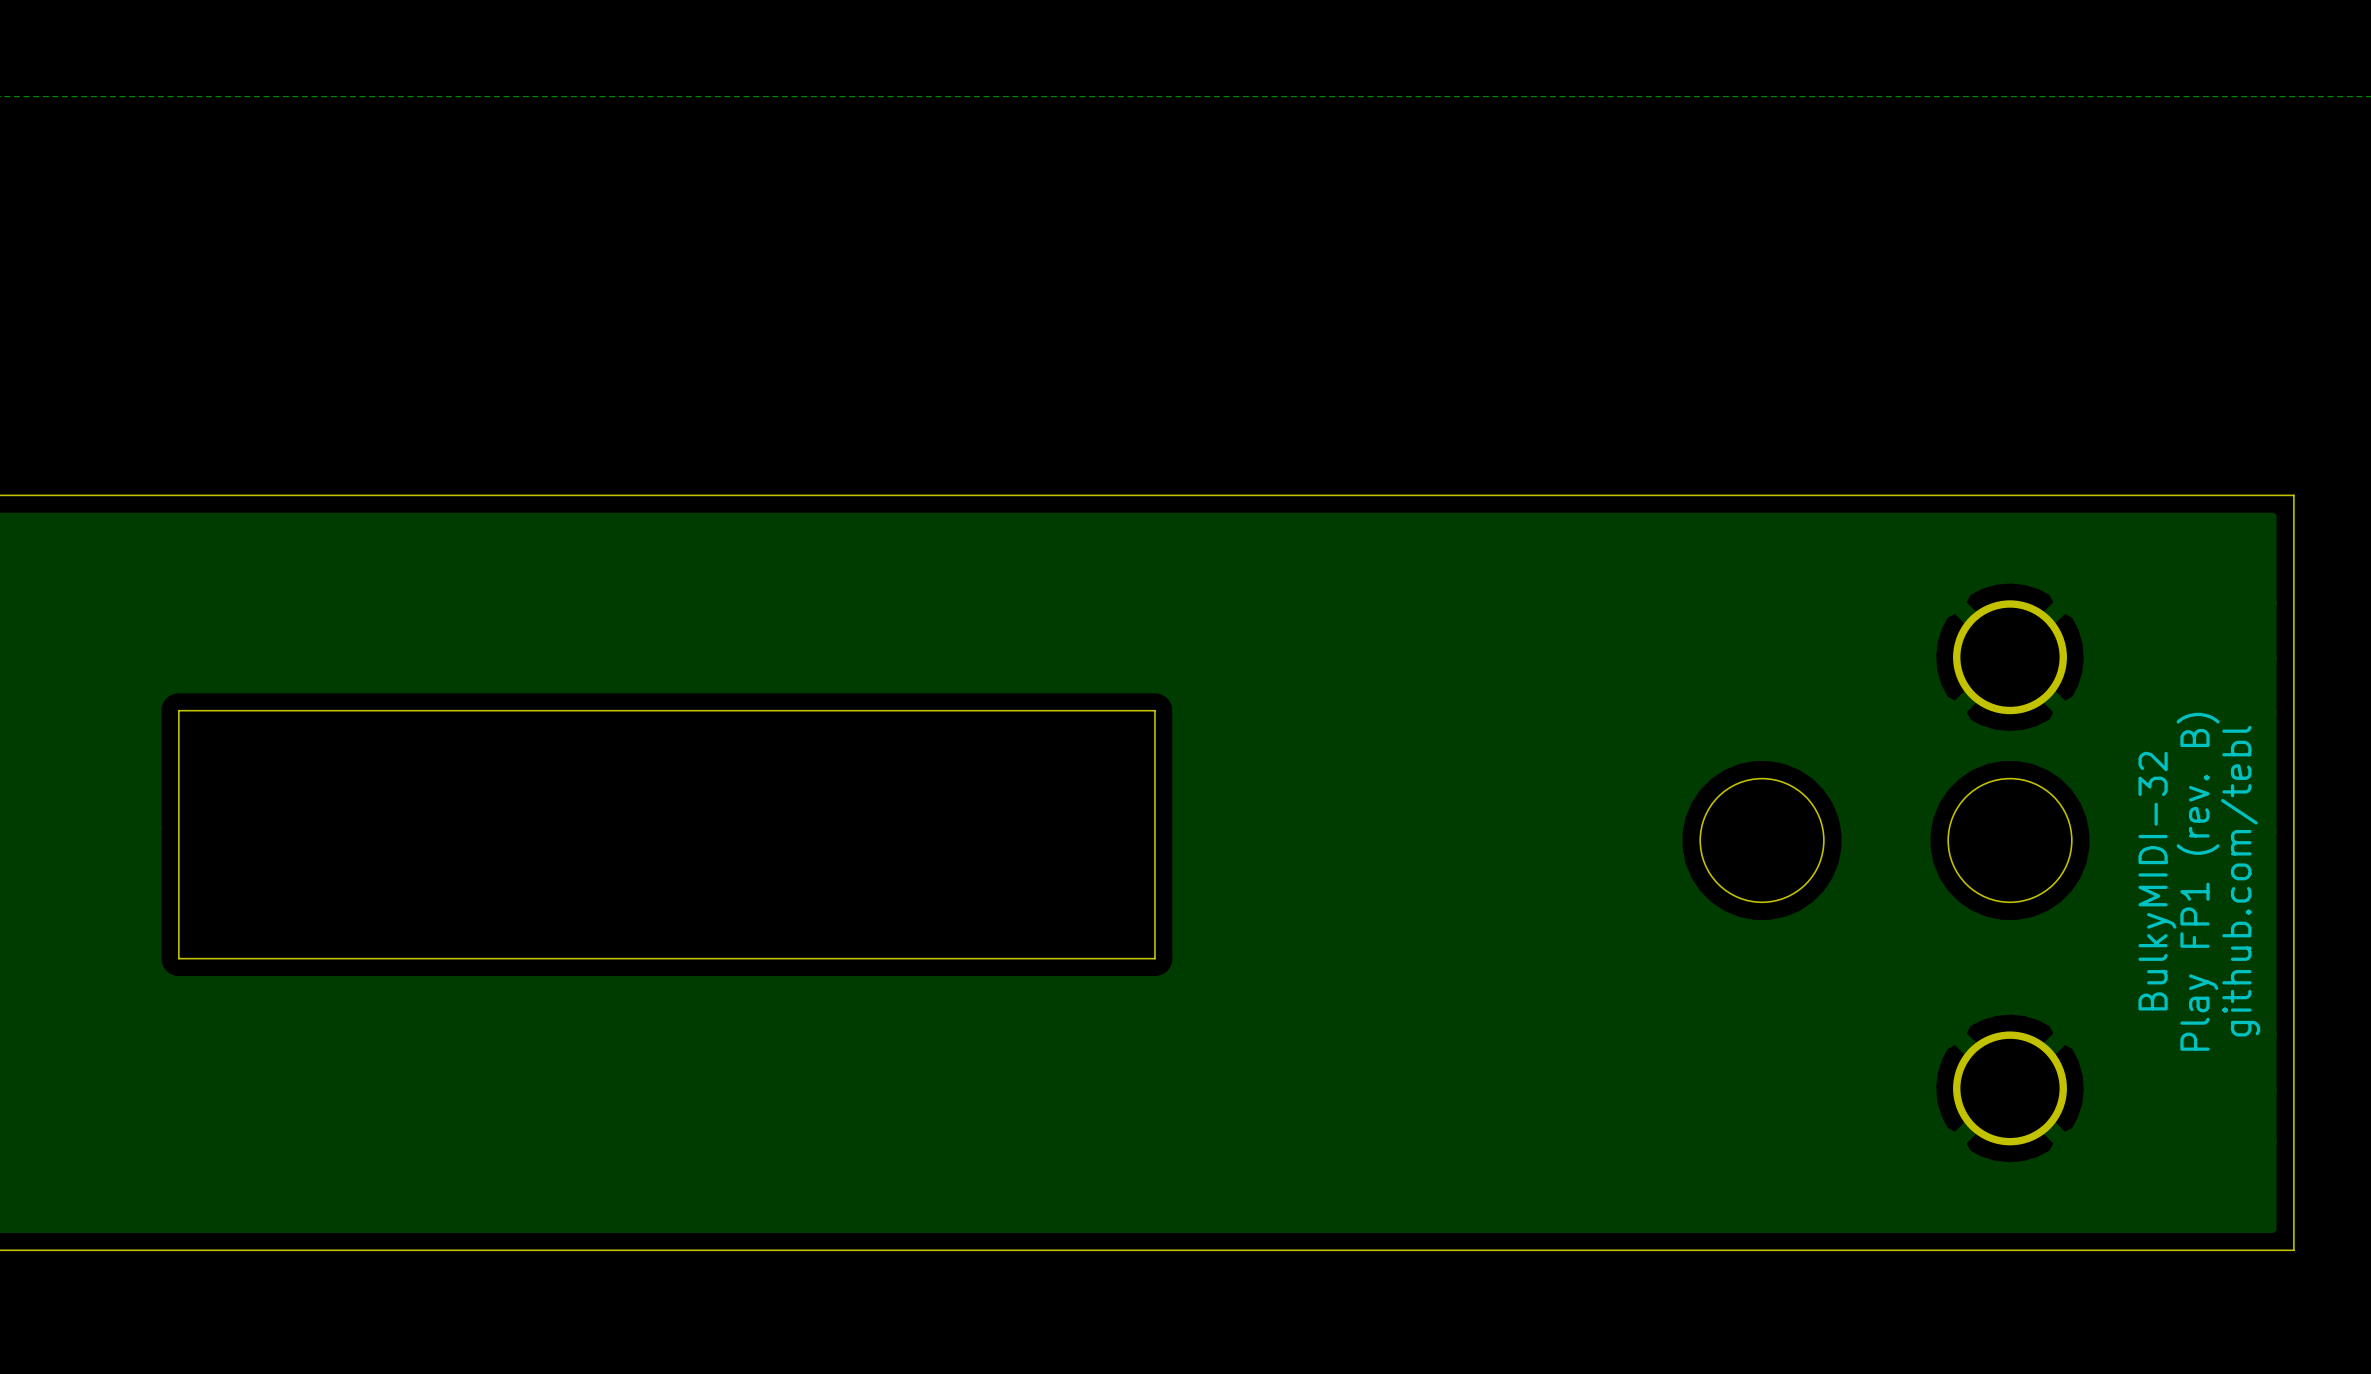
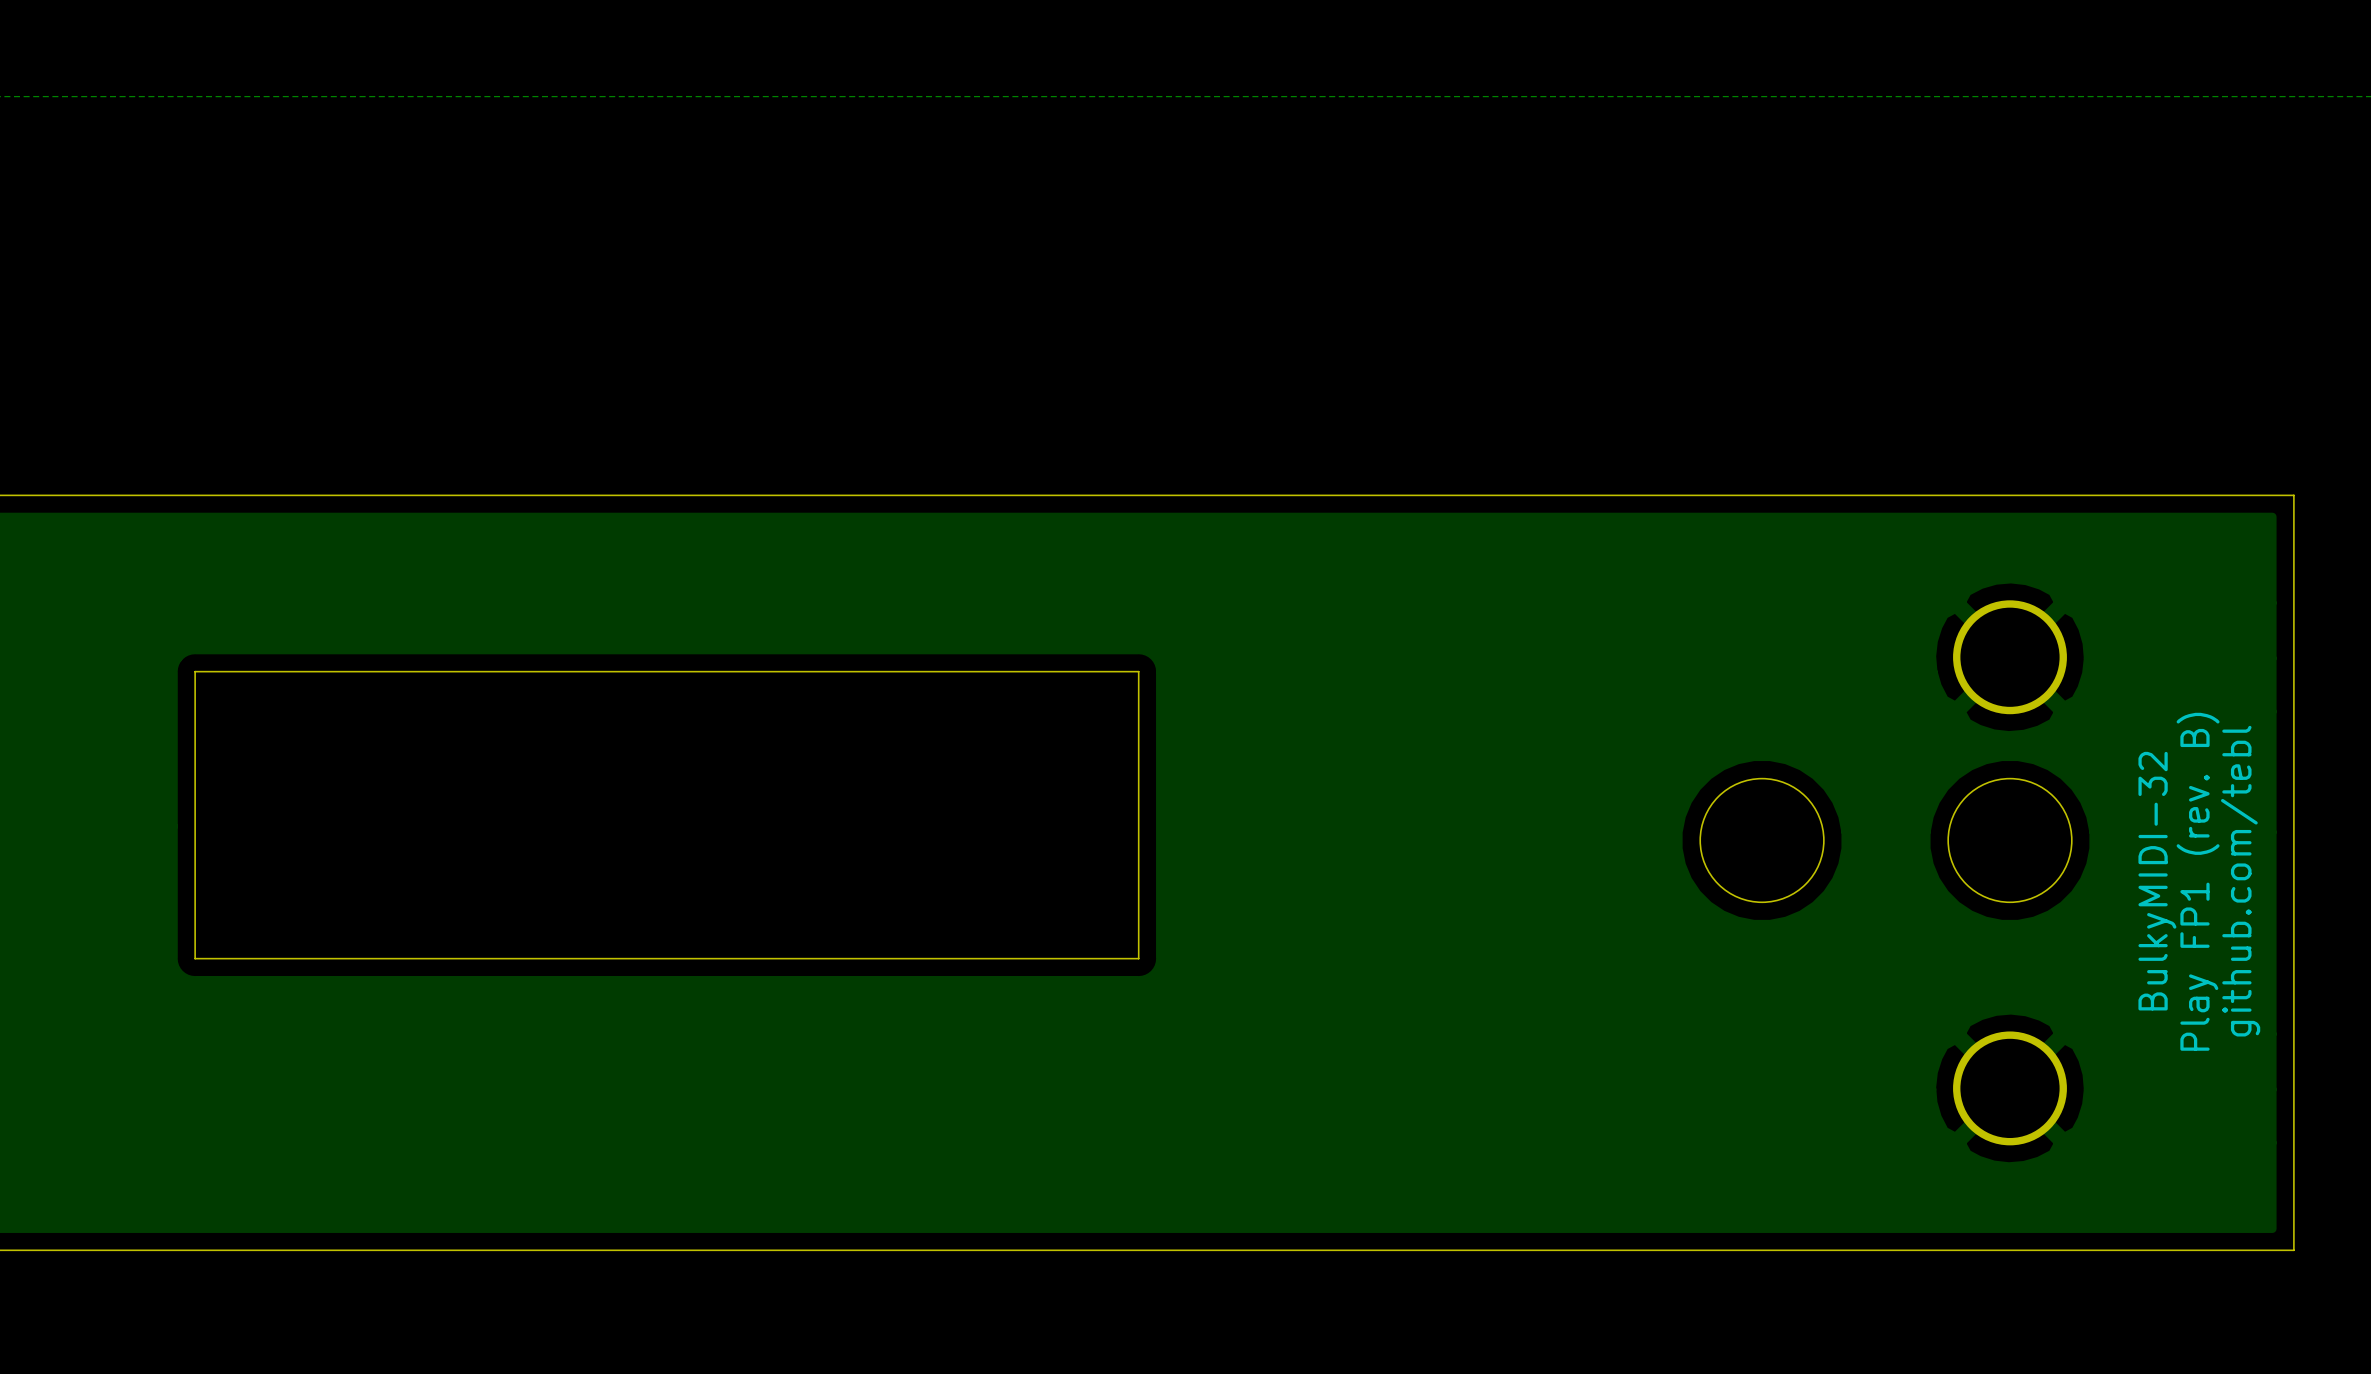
board edge: (1138, 958) (1154, 958) (1154, 710) (178, 710) (178, 958) (195, 958) -> (1138, 958) (1138, 671) (195, 671) (195, 958)

